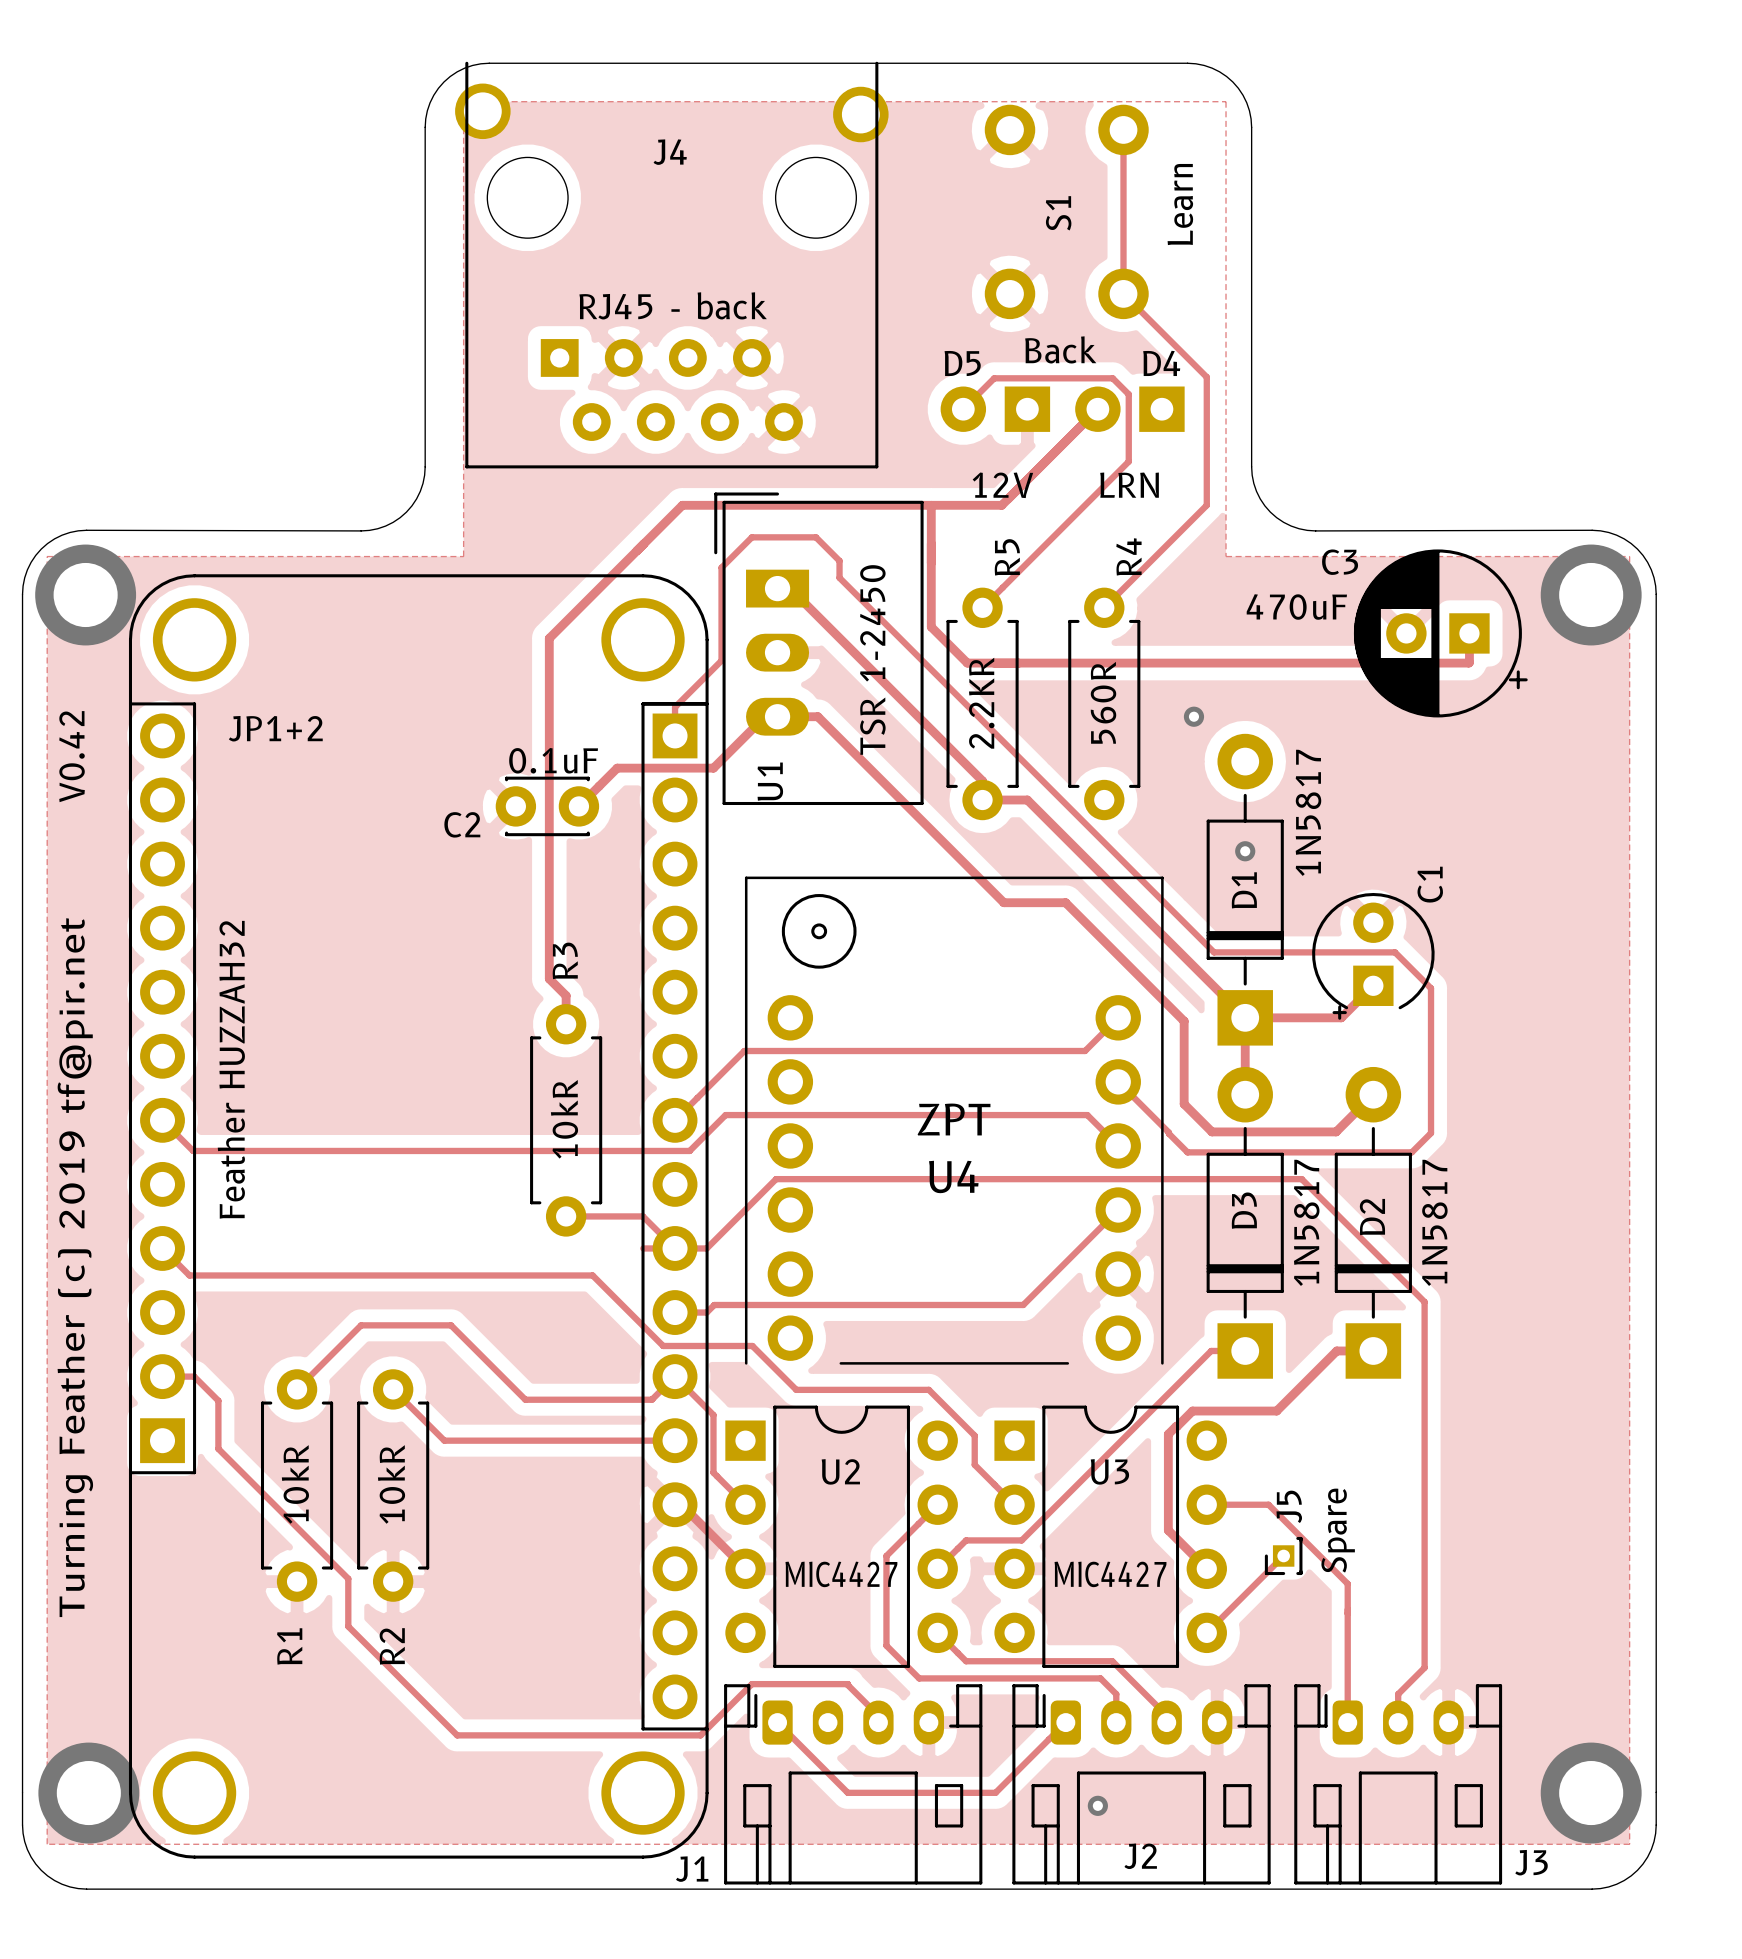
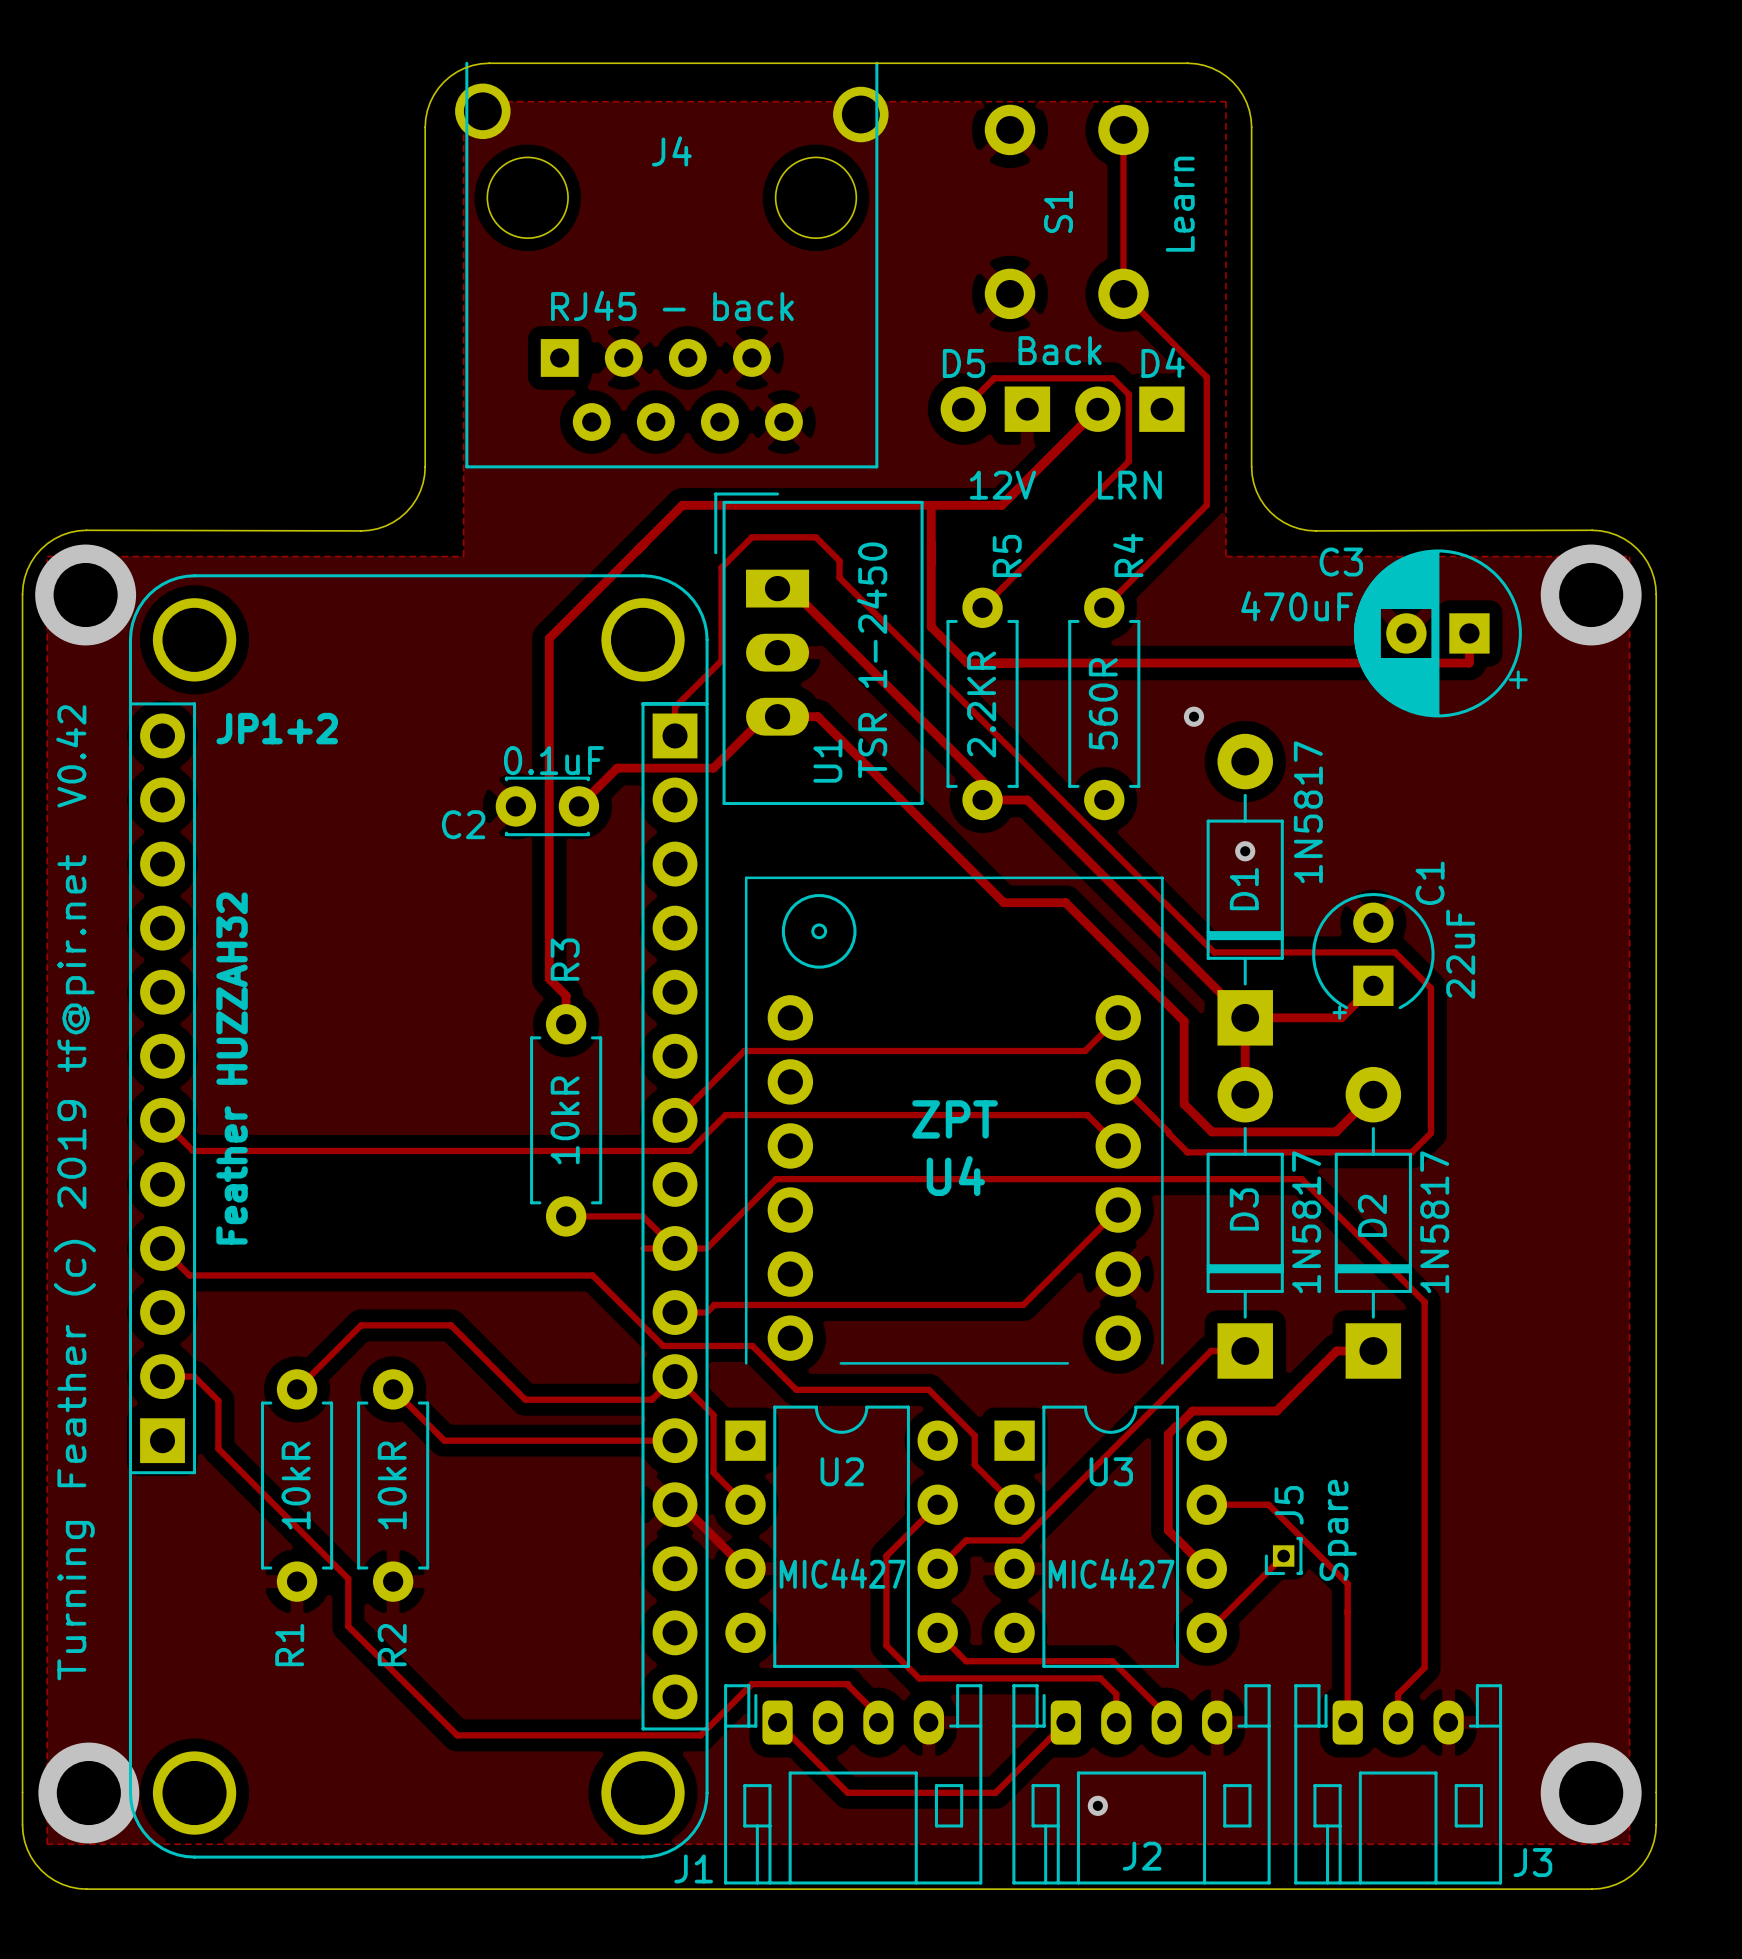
U1 name position: U1 (770, 781) -> U1 (827, 760)
C1 value: none -> 22uF (1460, 954)

